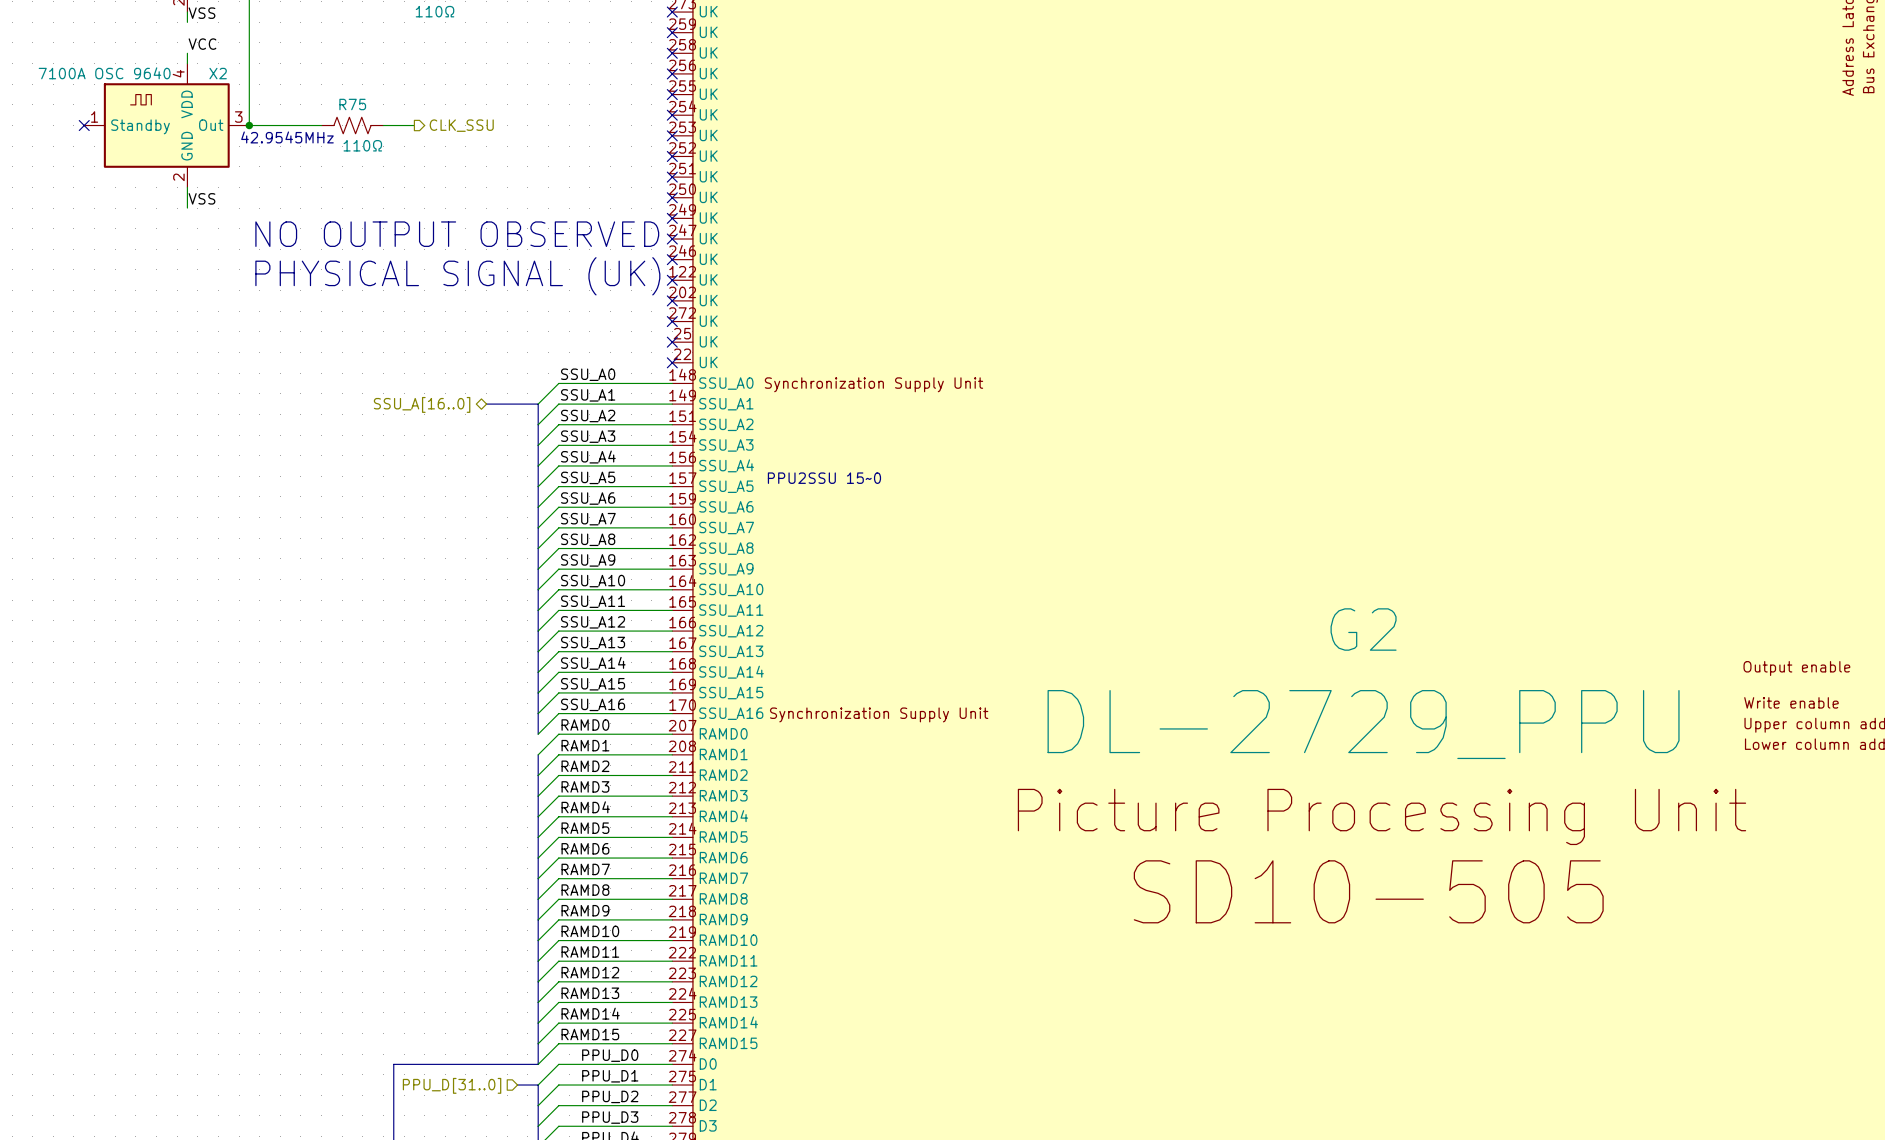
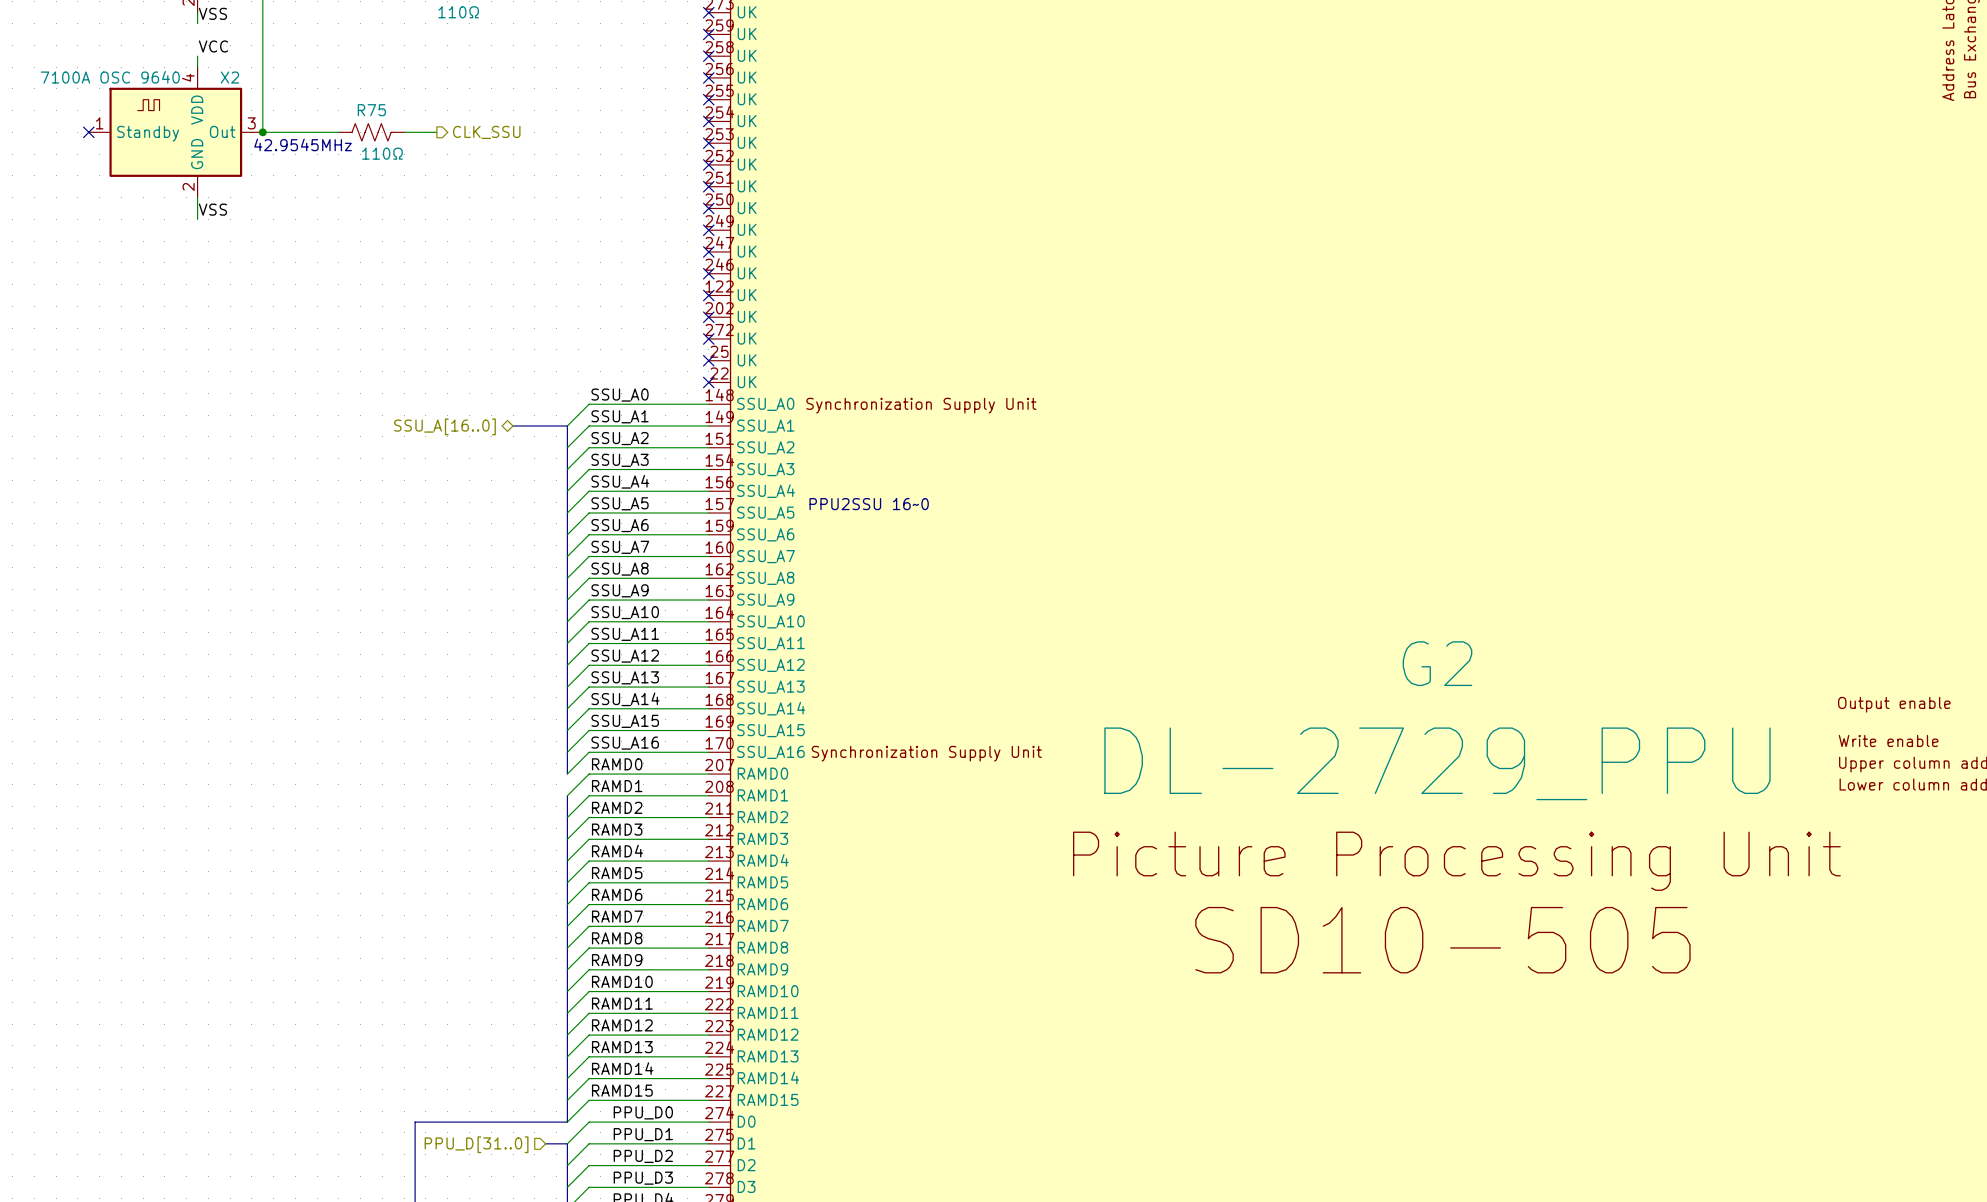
text: NO OUTPUT OBSERVED (457, 234) -> none
text: PHYSICAL SIGNAL (UK) (457, 276) -> none
text: PPU2SSU 15~0 (824, 478) -> PPU2SSU 16~0 (869, 504)

